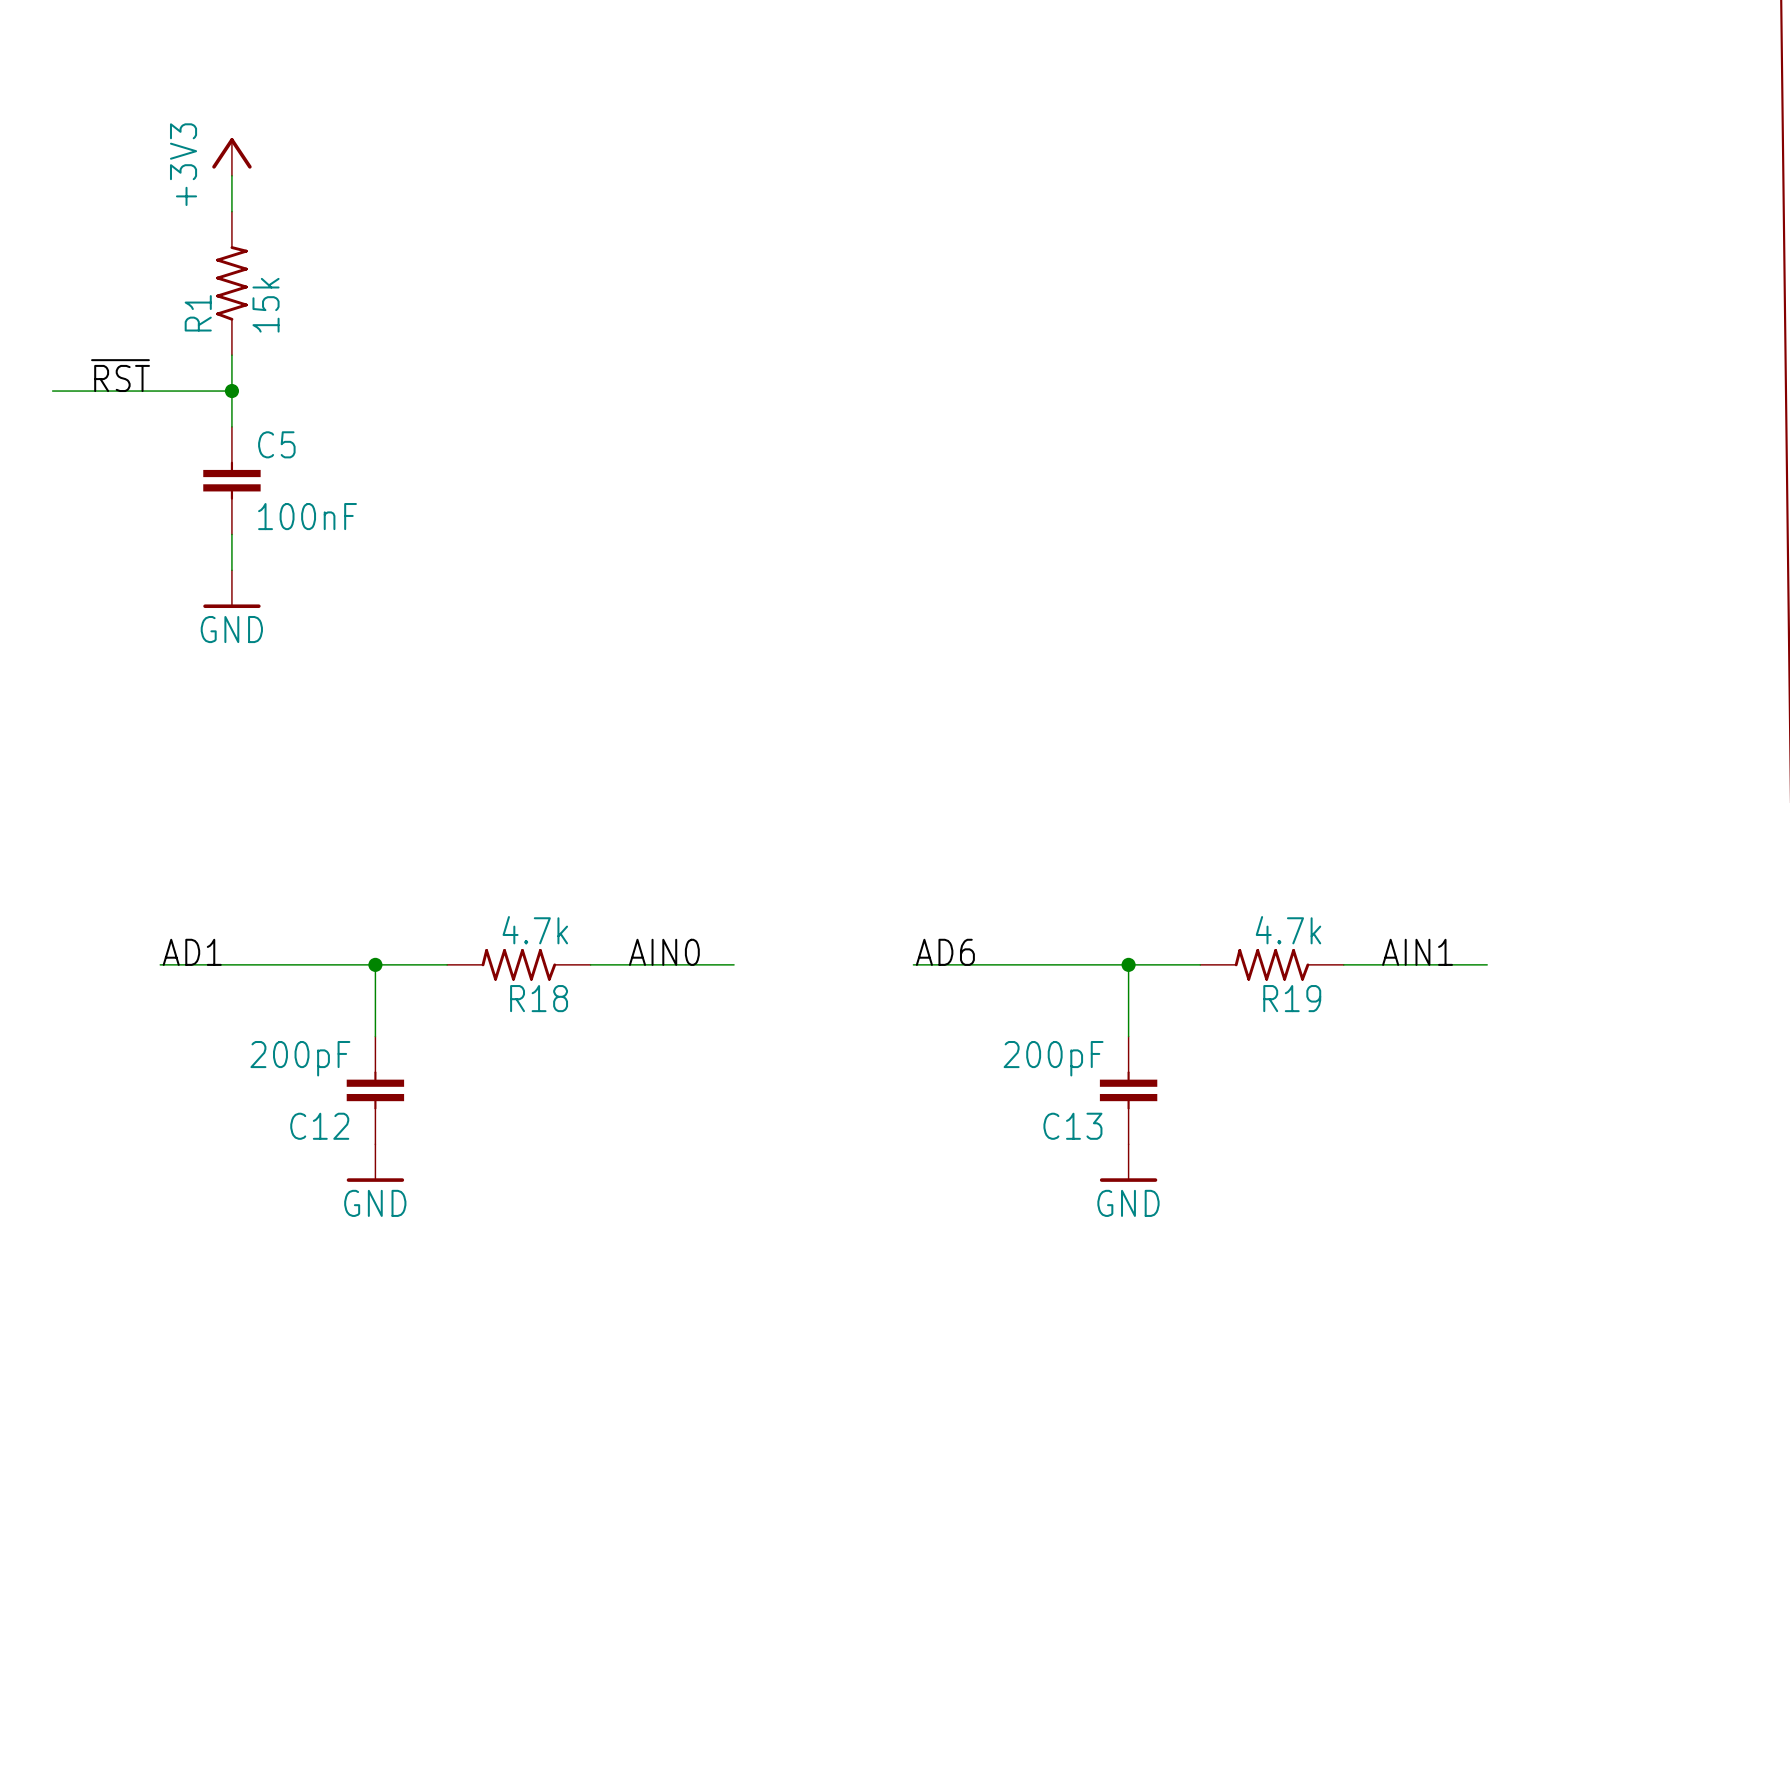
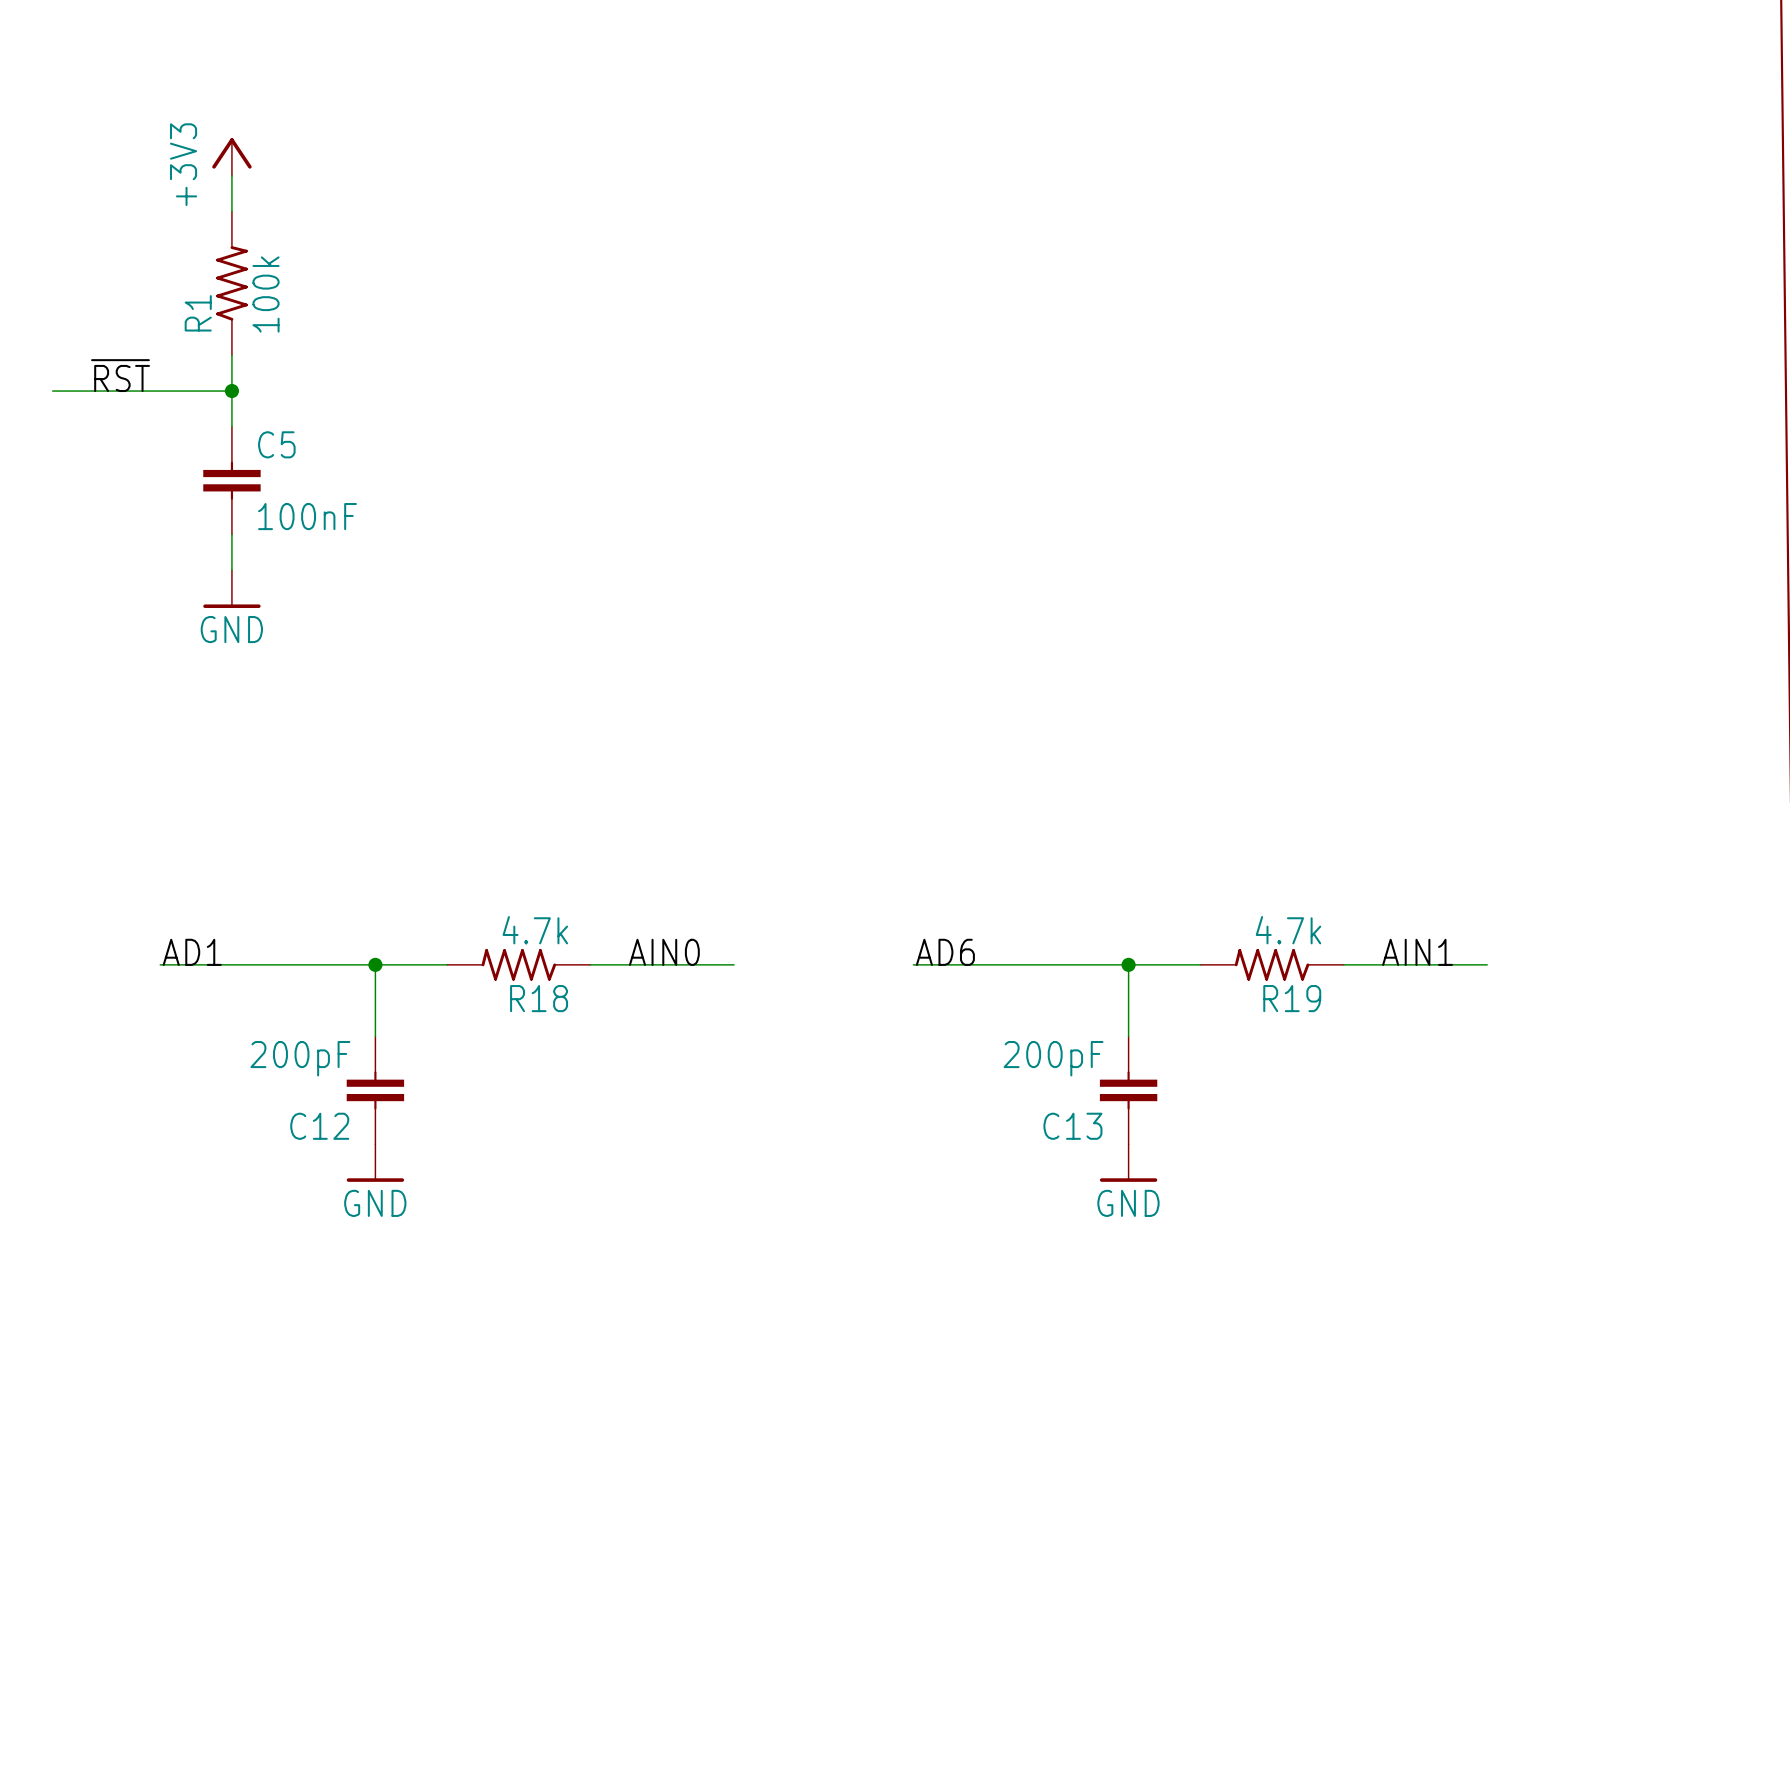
R1 value: 15k (266, 305) -> 100k (266, 294)

